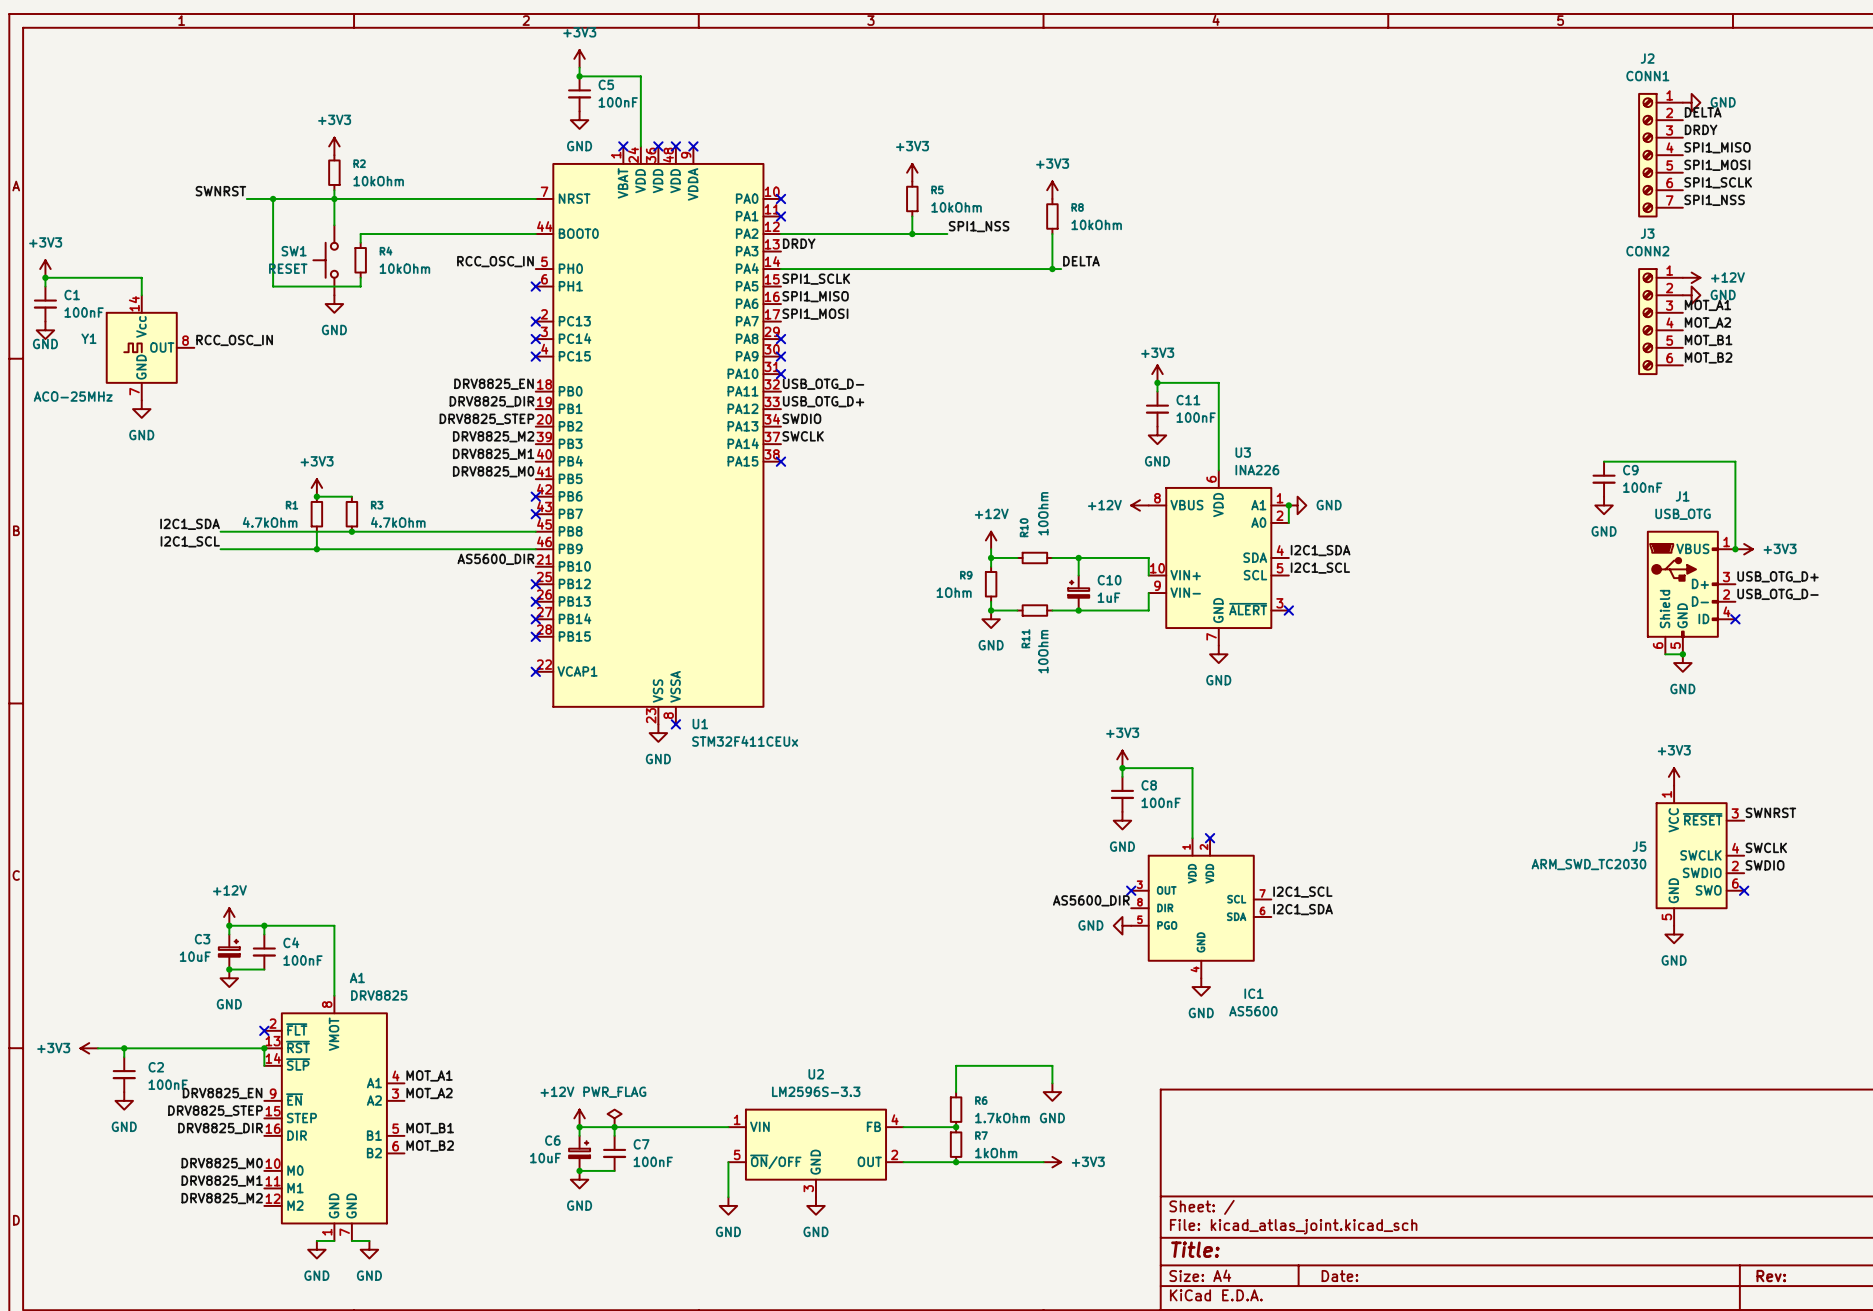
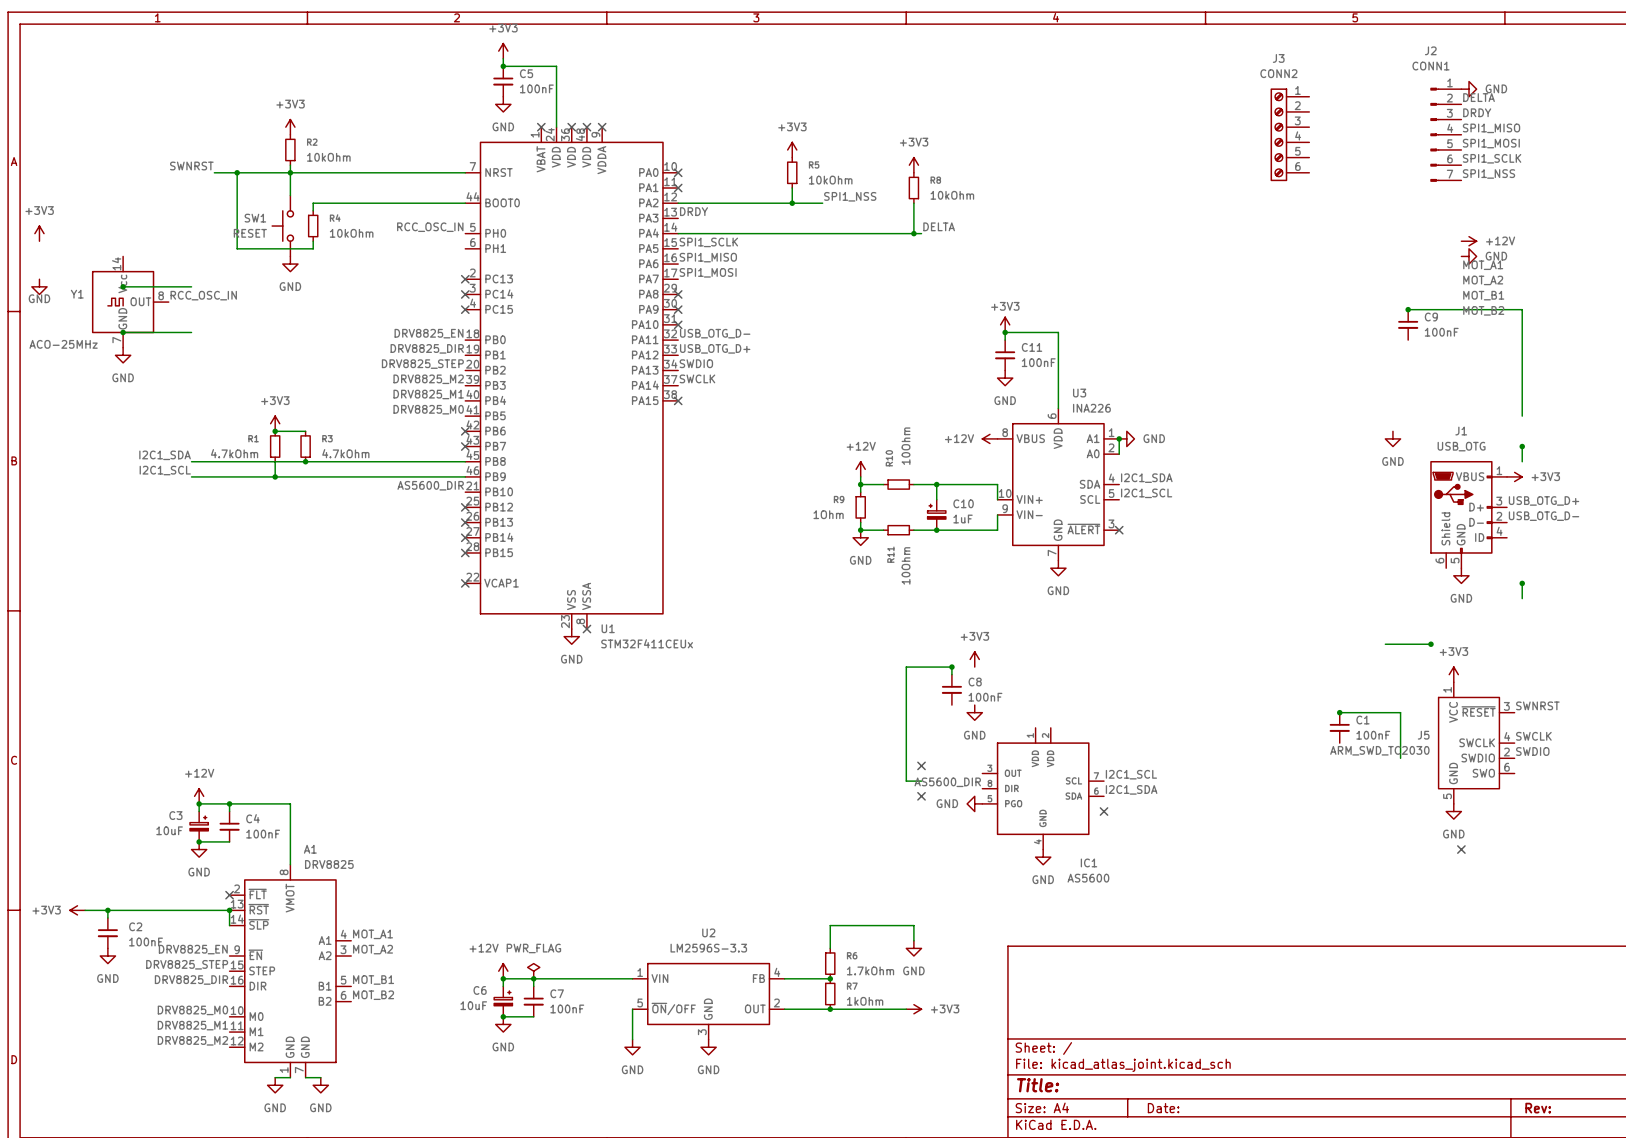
J2 symbol: [1638, 93, 1683, 218] -> [1430, 87, 1462, 182]
junction: (45, 277) -> none
wire: (45, 286) (45, 277) (141, 277) (141, 295) -> none
no-connect mark: (535, 286) -> none
C1 position: (45, 304) -> (1339, 727)
J3 position: (1660, 321) -> (1289, 134)
wire: none -> (123, 286) (191, 286)
junction: none -> (123, 286)
wire: none -> (1408, 309) (1522, 309) (1522, 416)
junction: none -> (1408, 309)
wire: none -> (123, 332) (191, 332)
junction: none -> (123, 332)
wire: (1604, 461) (1735, 461) (1735, 549) -> none
C9 position: (1604, 479) -> (1408, 324)
wire: none -> (1522, 446) (1522, 461)
junction position: (1735, 549) -> (1522, 446)
no-connect mark: (1735, 619) -> none
wire: (1665, 654) (1682, 654) -> none
junction: (1682, 654) -> none
wire: none -> (1522, 583) (1522, 598)
junction: none -> (1522, 583)
wire: none -> (1385, 644) (1430, 644)
junction: none -> (1430, 644)
junction position: (1122, 768) -> (951, 667)
wire: none -> (951, 674) (951, 667) (906, 667) (906, 781) (921, 781)
wire: (1122, 776) (1122, 768) (1192, 768) (1192, 838) -> none
C8 position: (1122, 794) -> (951, 689)
wire: none -> (1339, 712) (1400, 712) (1400, 758)
junction: none -> (1339, 712)
no-connect mark: (1210, 838) -> none
no-connect mark: none -> (921, 765)
no-connect mark: (1131, 890) -> none
no-connect mark: (1744, 890) -> none
no-connect mark: none -> (921, 796)
no-connect mark: none -> (1104, 811)
no-connect mark: none -> (1461, 849)

